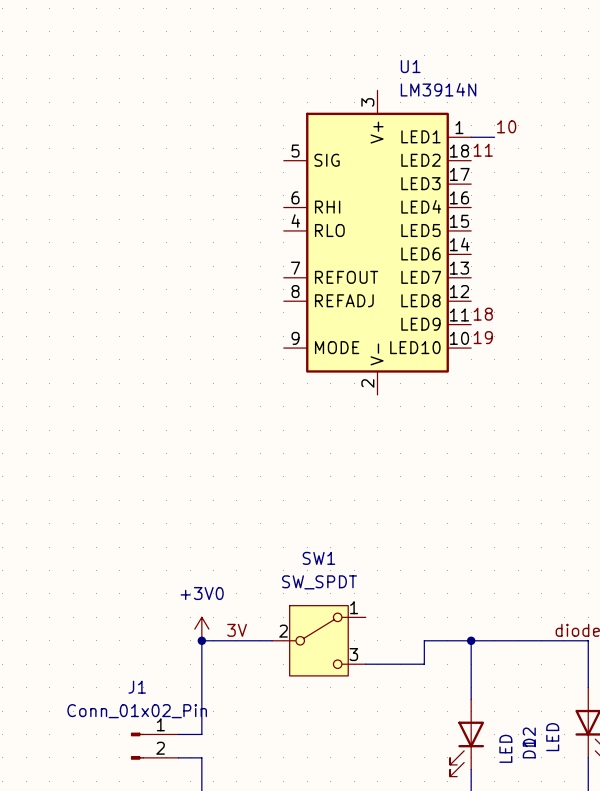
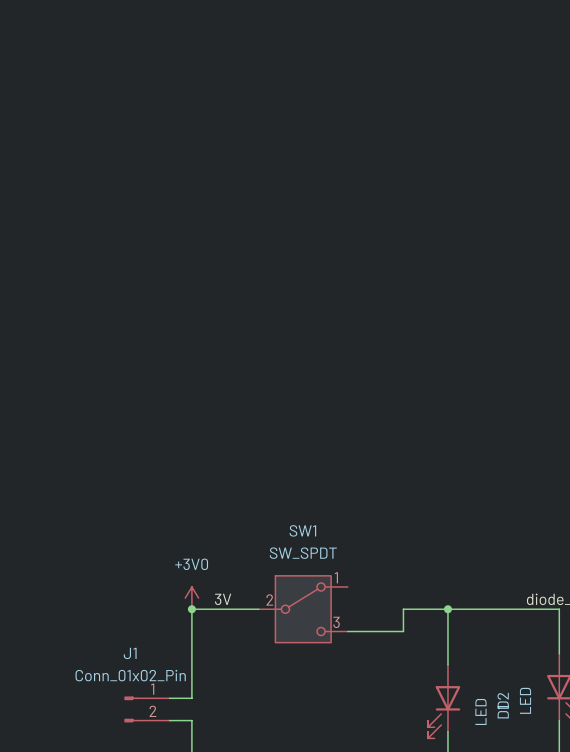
label: 10 (506, 126) -> none
wire: (471, 137) (494, 137) -> none
label: 11 (483, 150) -> none
U1: LM3914N (377, 242) -> none
label: 18 (483, 314) -> none
label: 19 (483, 337) -> none

